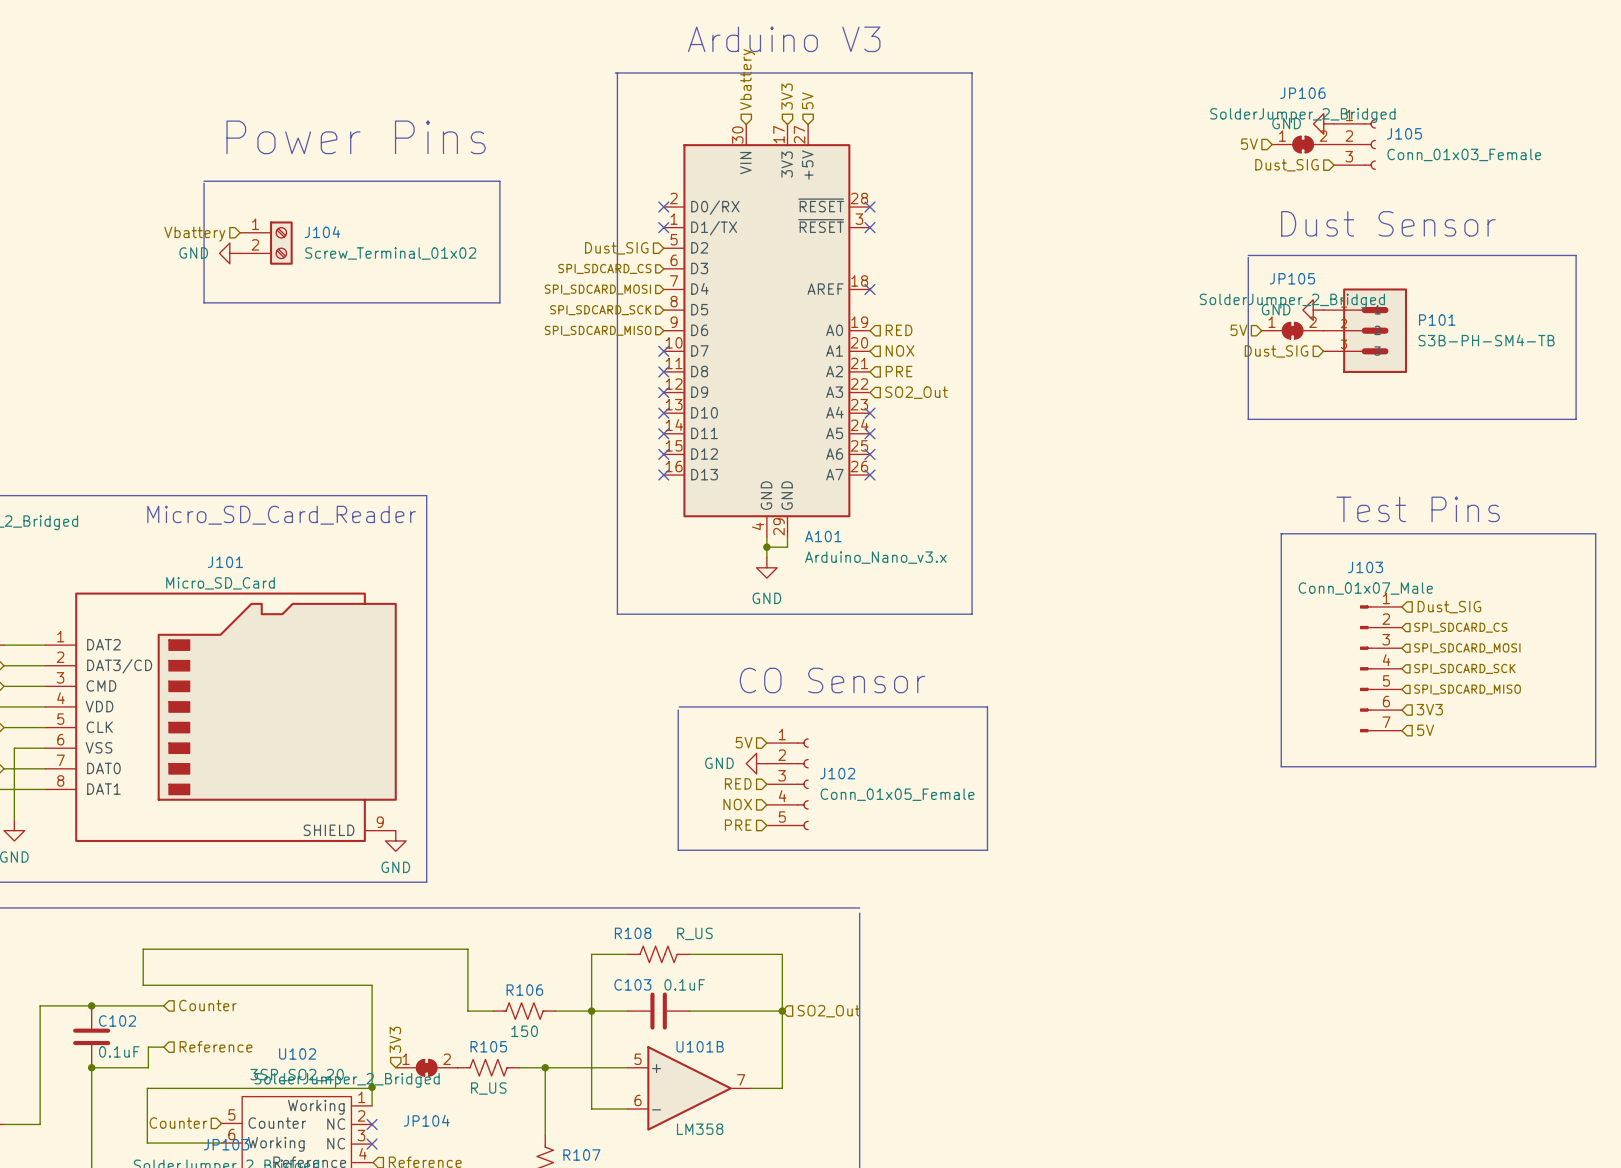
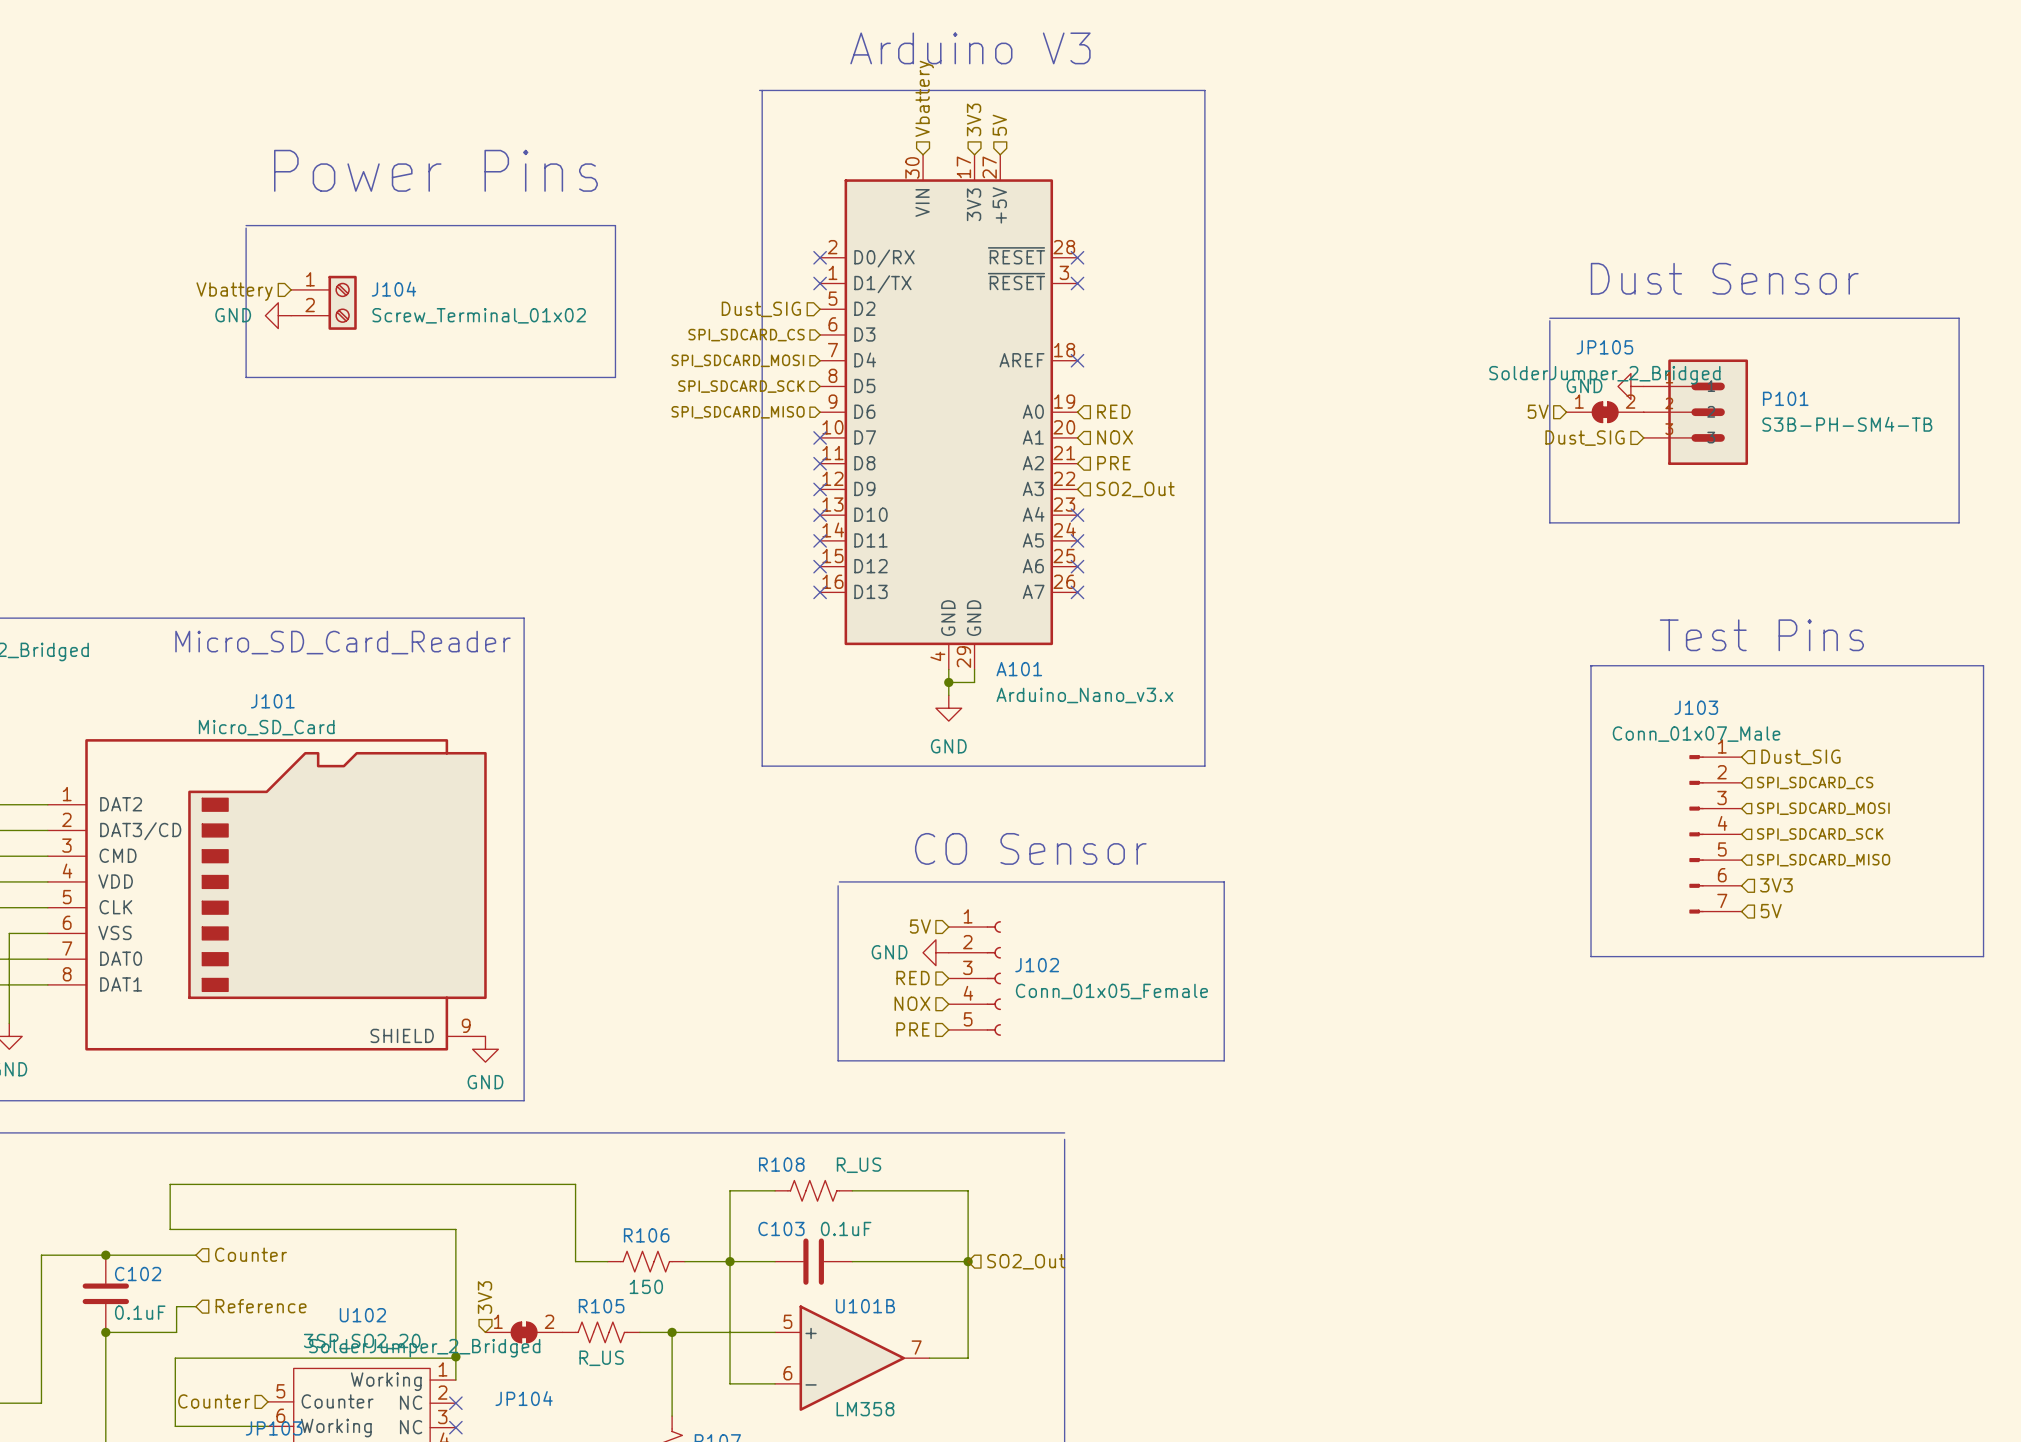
power symbol: GND (1323, 123) -> none
hierarchical label: 5V (1249, 144) -> none
JP106: SolderJumper_2_Bridged (1303, 144) -> none
J105: Conn_01x03_Female (1354, 144) -> none
hierarchical label: Dust_SIG (1287, 165) -> none

